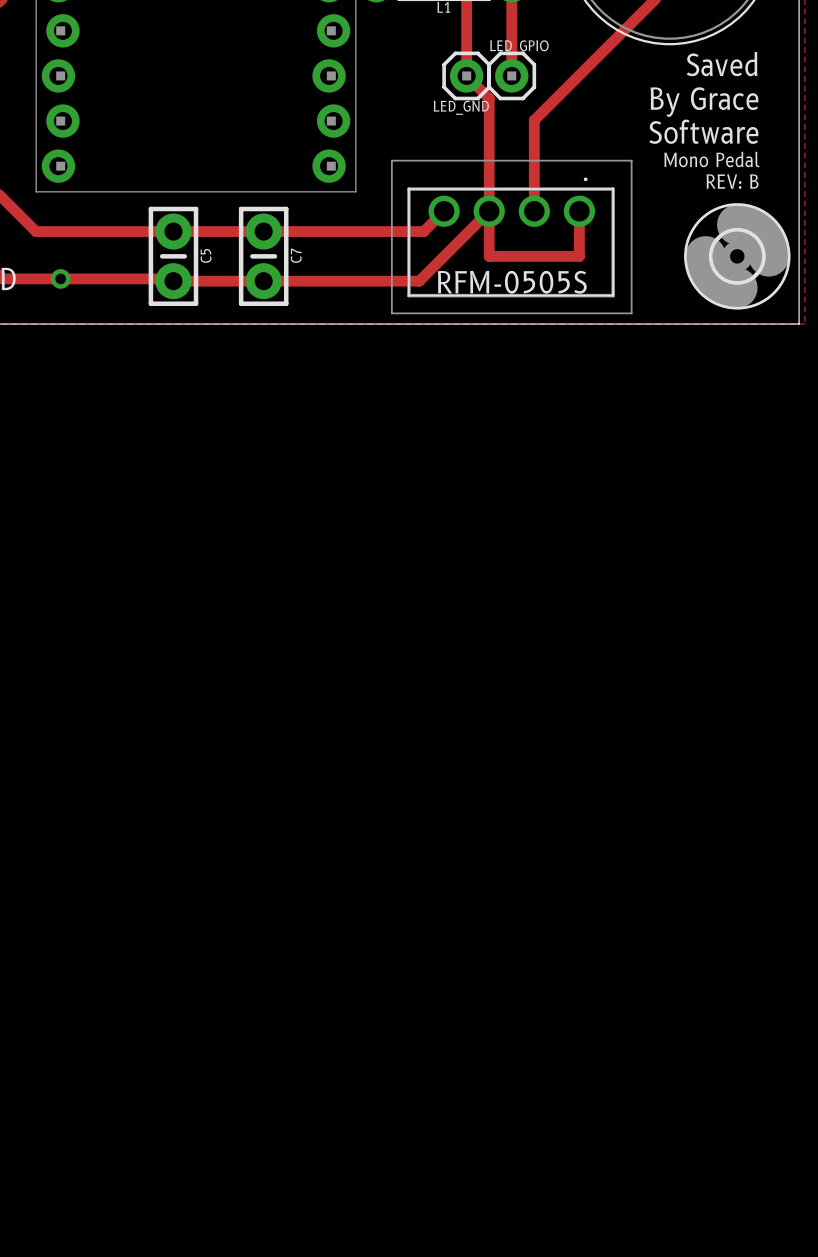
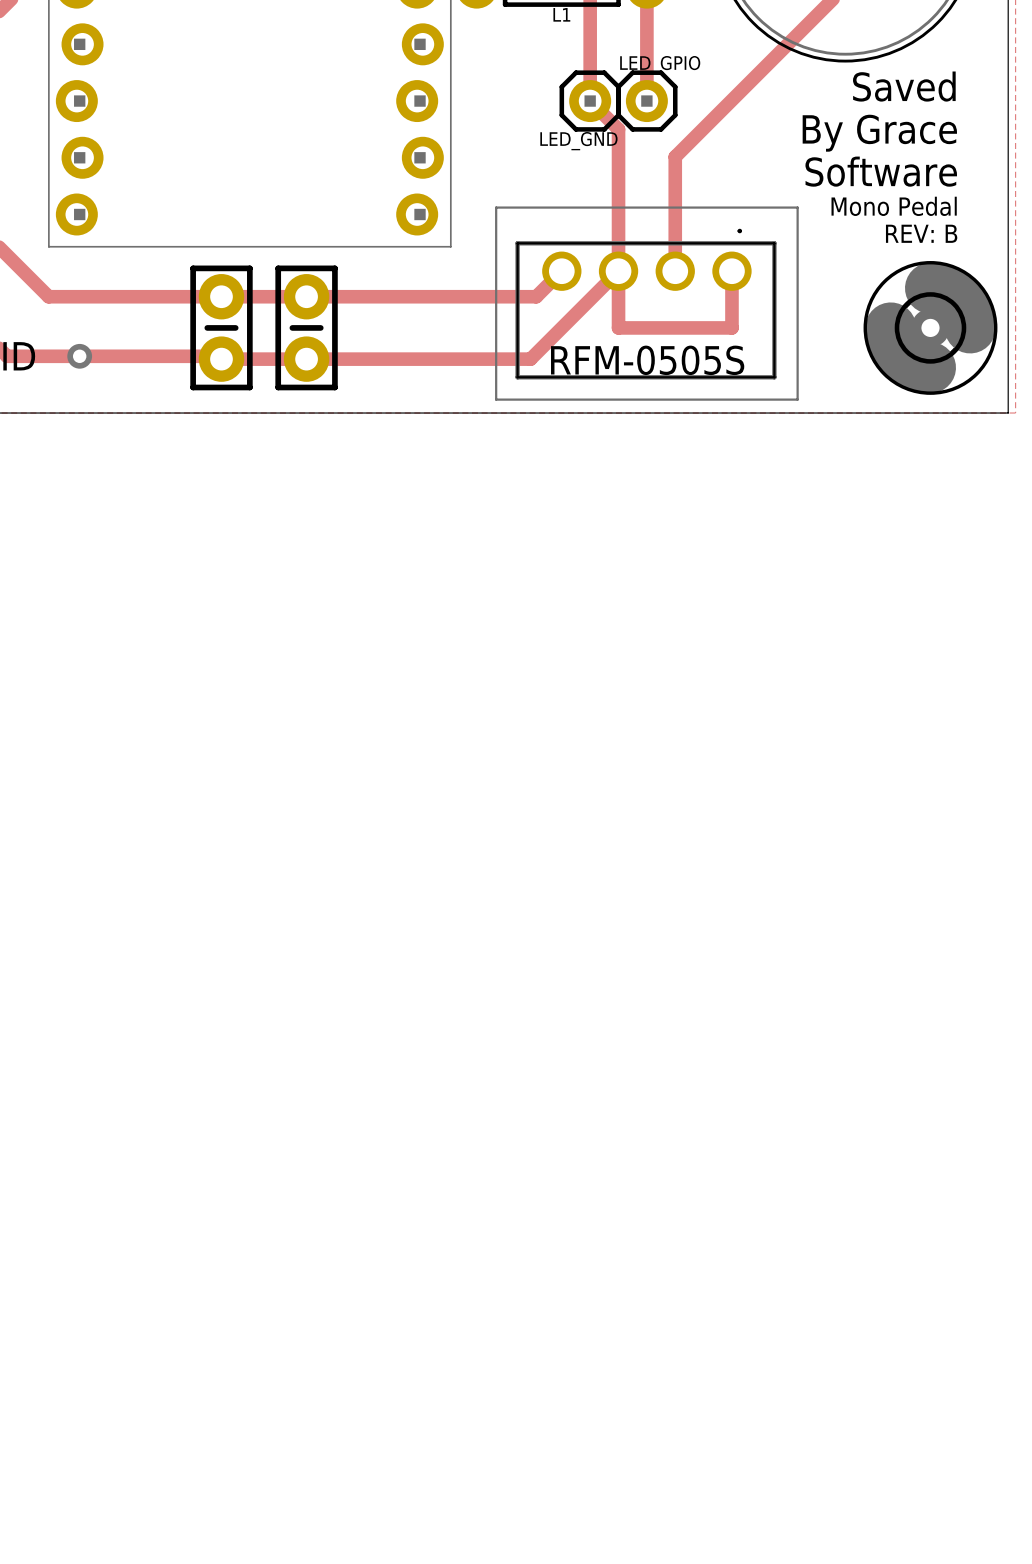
C5 name: C5 (206, 255) -> none
part: none -> (306, 327)
C7: (263, 256) -> none

